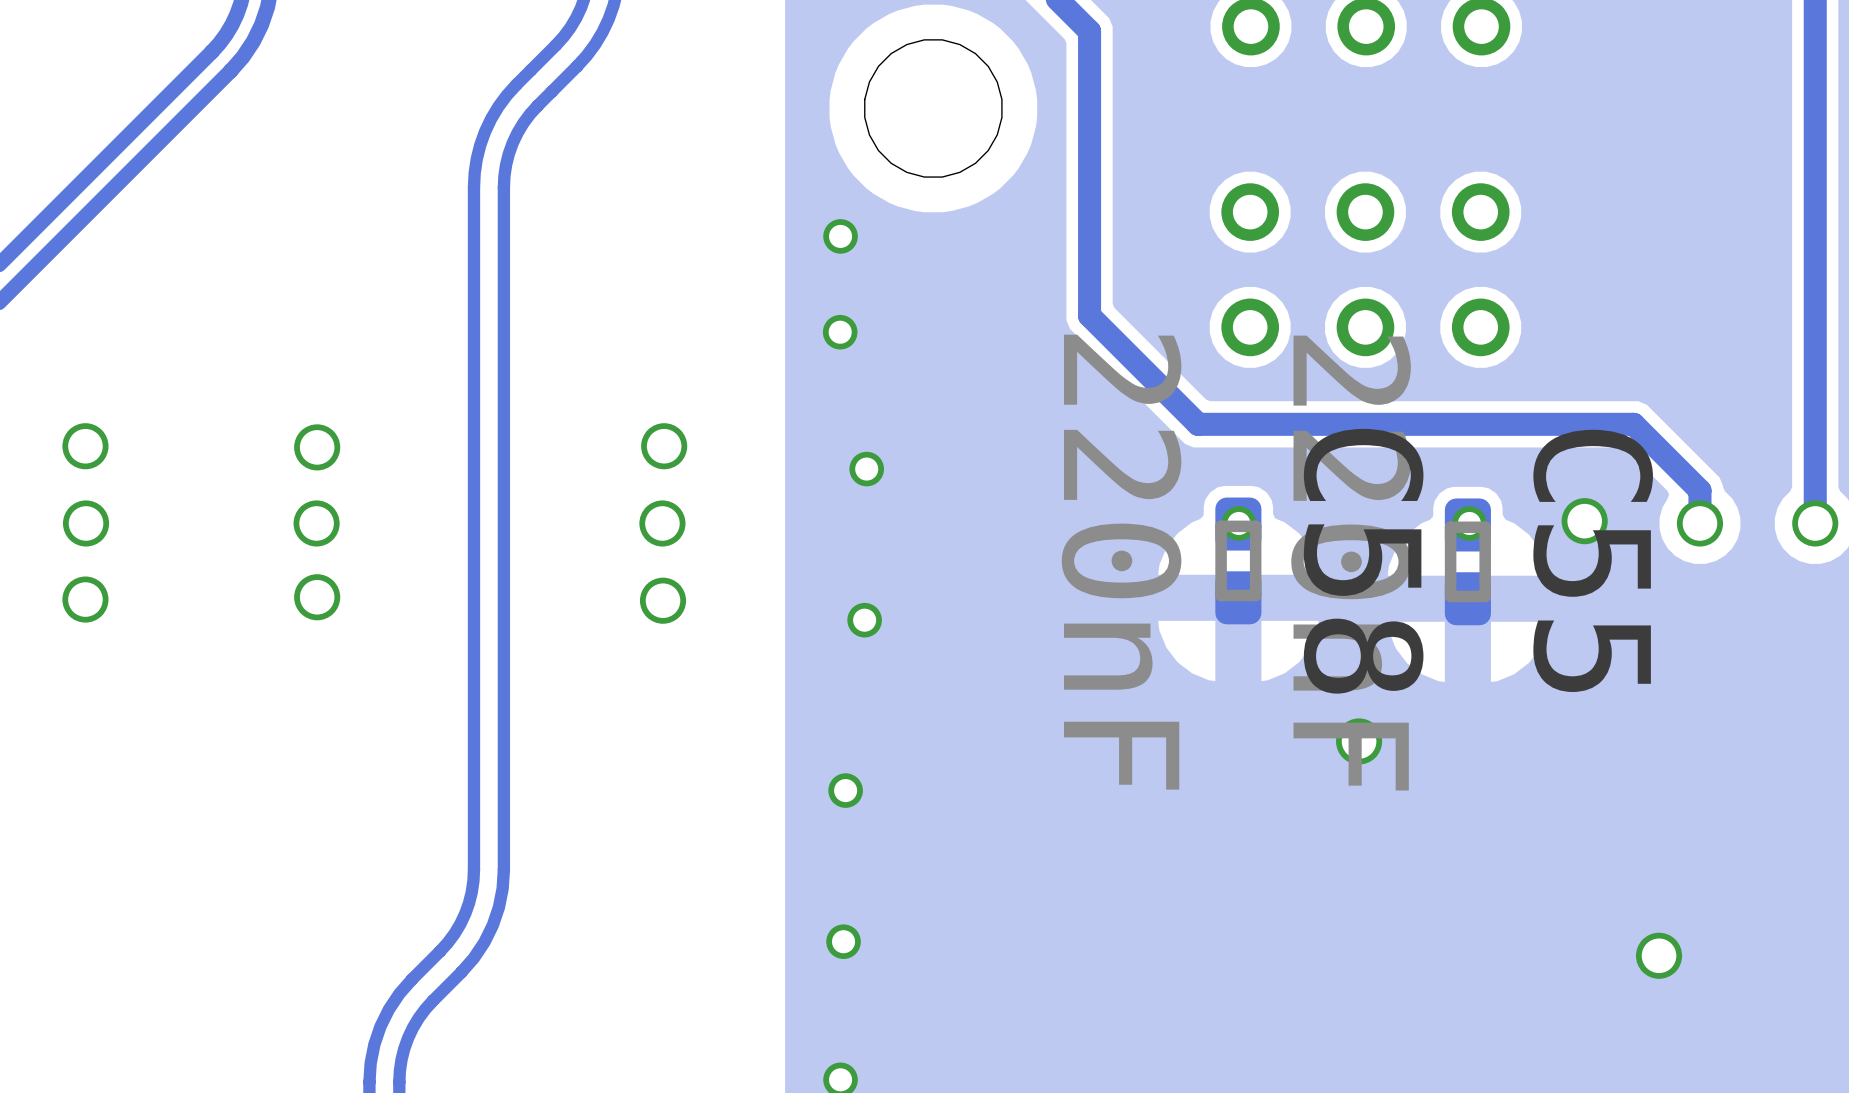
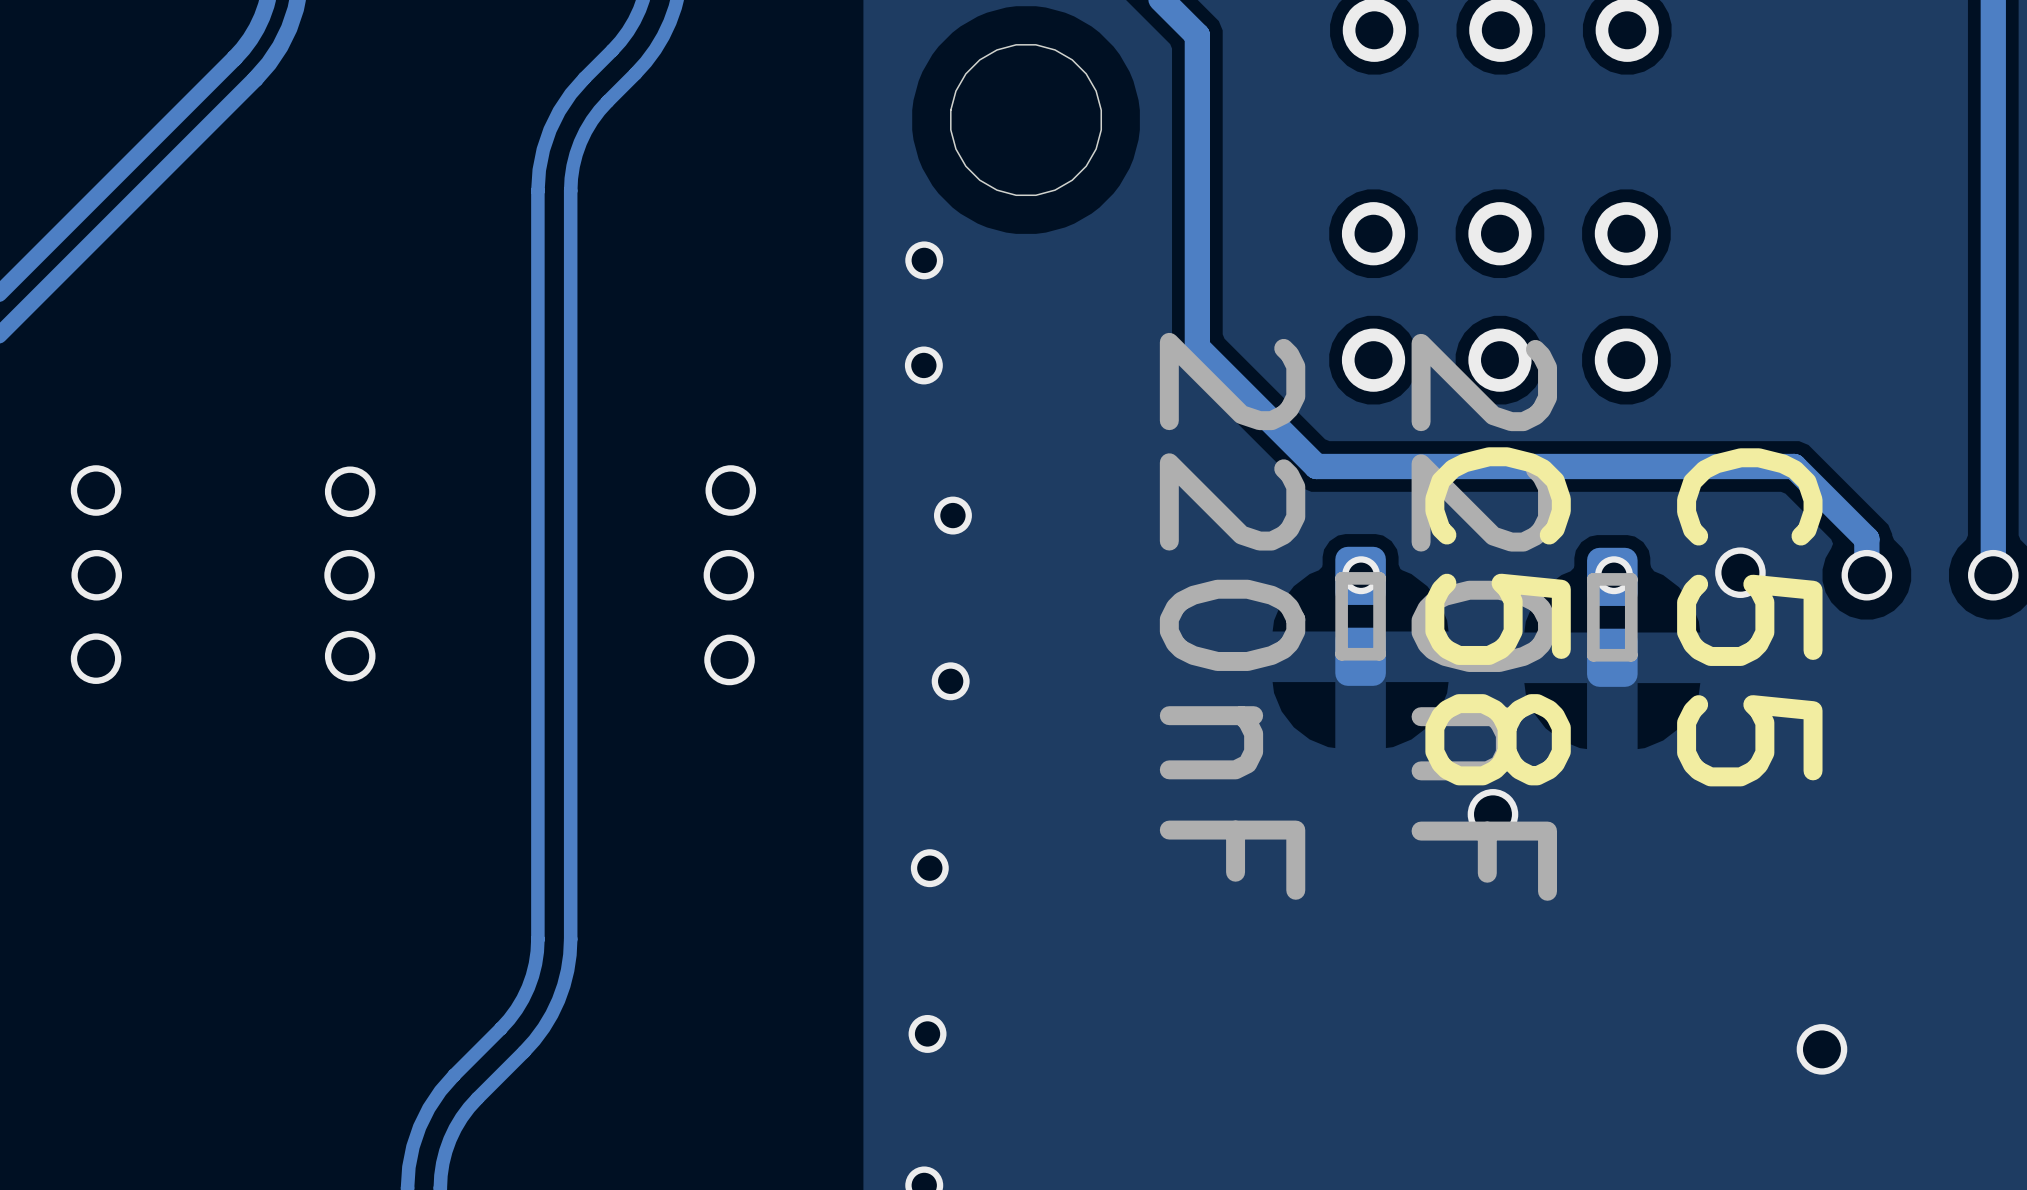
track: (530, 70) (506, 95) (491, 118) (480, 145) (474, 173) (473, 869) (471, 892) (465, 913) (454, 933) (440, 951) -> (584, 78) (559, 111) (550, 129) (543, 149) (537, 190) (537, 951) (532, 975) (522, 998) (509, 1019) (485, 1044)
track: (551, 91) (530, 114) (517, 132) (508, 153) (504, 176) (503, 869) (498, 907) (492, 925) (484, 942) (461, 972) -> (607, 101) (591, 120) (580, 142) (573, 166) (570, 190) (569, 954) (563, 985) (551, 1014) (534, 1040) (508, 1067)

